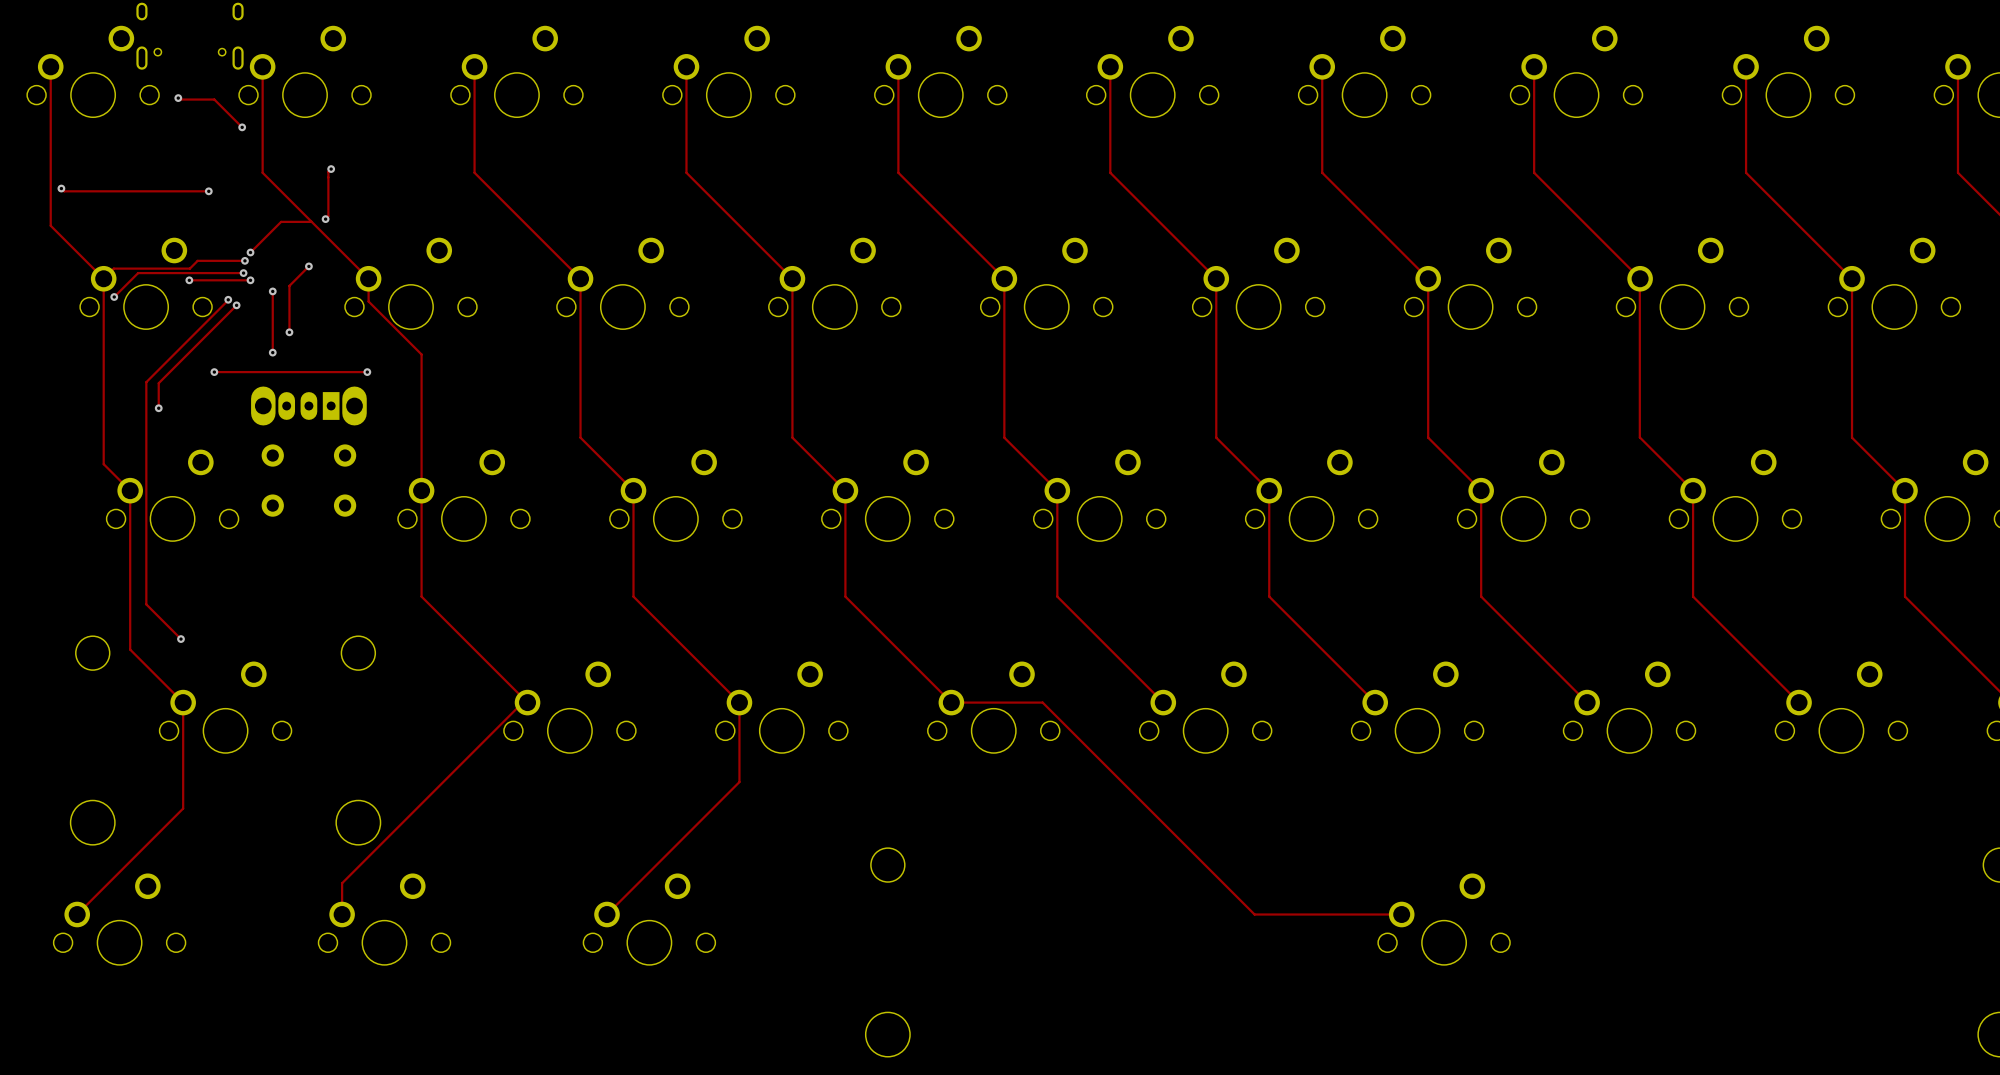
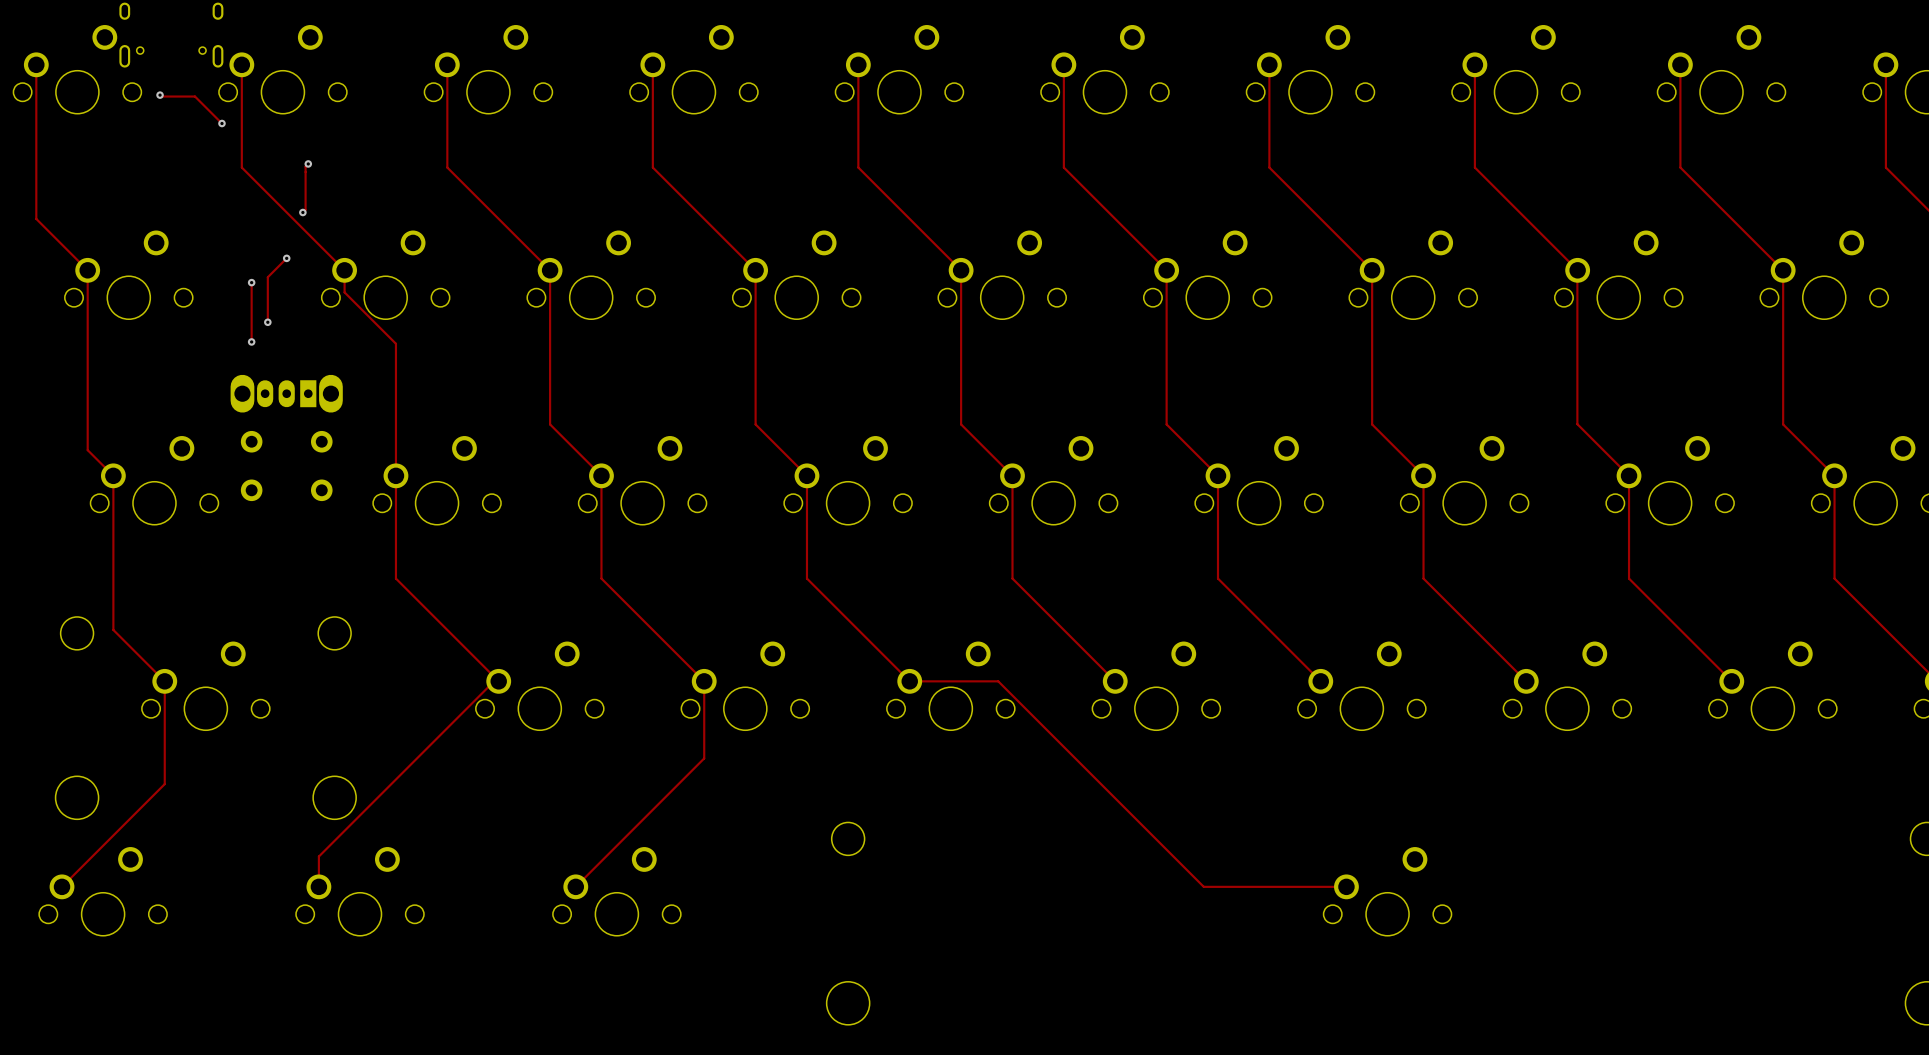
track: (61, 188) (64, 191) (208, 191) -> none
via: (61, 188) -> none
via: (208, 191) -> none
track: (311, 221) (281, 221) (250, 252) -> none
via: (250, 252) -> none
track: (244, 260) (197, 260) (189, 268) (113, 268) (103, 278) -> none
via: (244, 260) -> none
track: (243, 273) (138, 273) (114, 297) -> none
via: (243, 273) -> none
track: (189, 280) (250, 280) -> none
via: (189, 280) -> none
via: (250, 280) -> none
via: (114, 297) -> none
track: (228, 299) (146, 382) (146, 604) (180, 639) -> none
via: (228, 299) -> none
track: (236, 305) (158, 383) (158, 408) -> none
via: (236, 305) -> none
track: (214, 372) (367, 372) -> none
via: (214, 372) -> none
via: (367, 372) -> none
via: (158, 408) -> none
via: (180, 639) -> none

